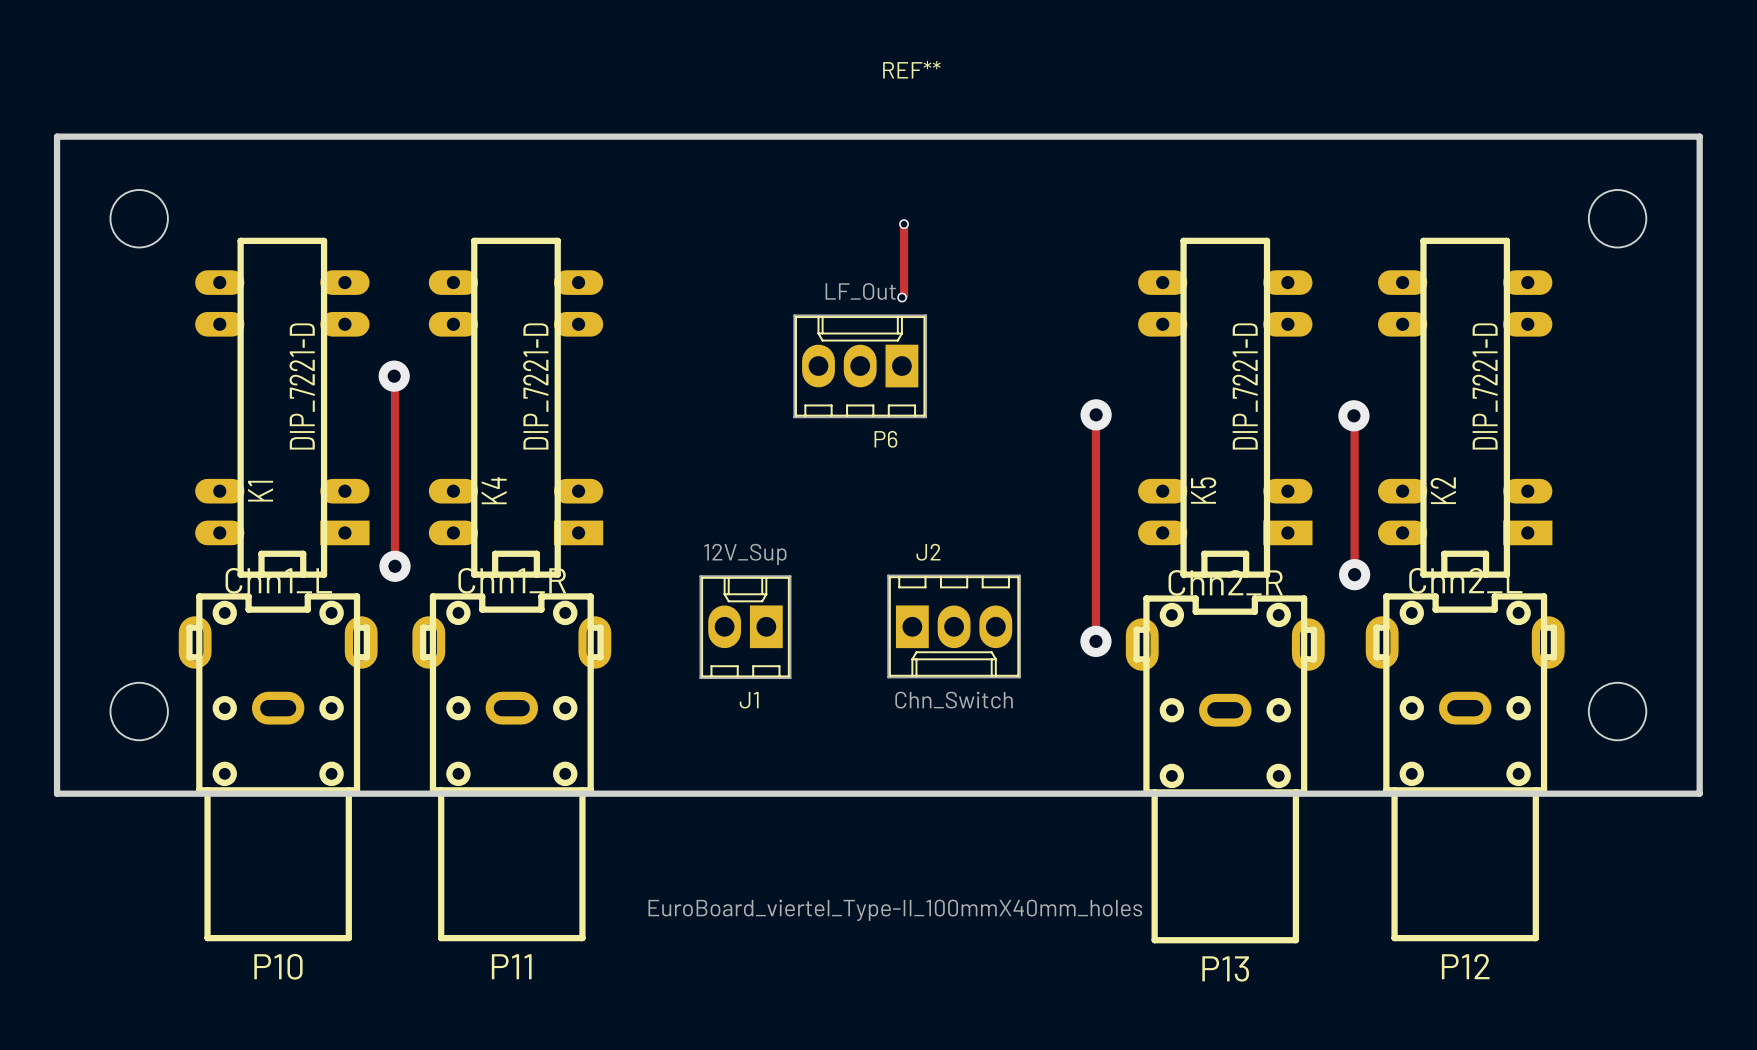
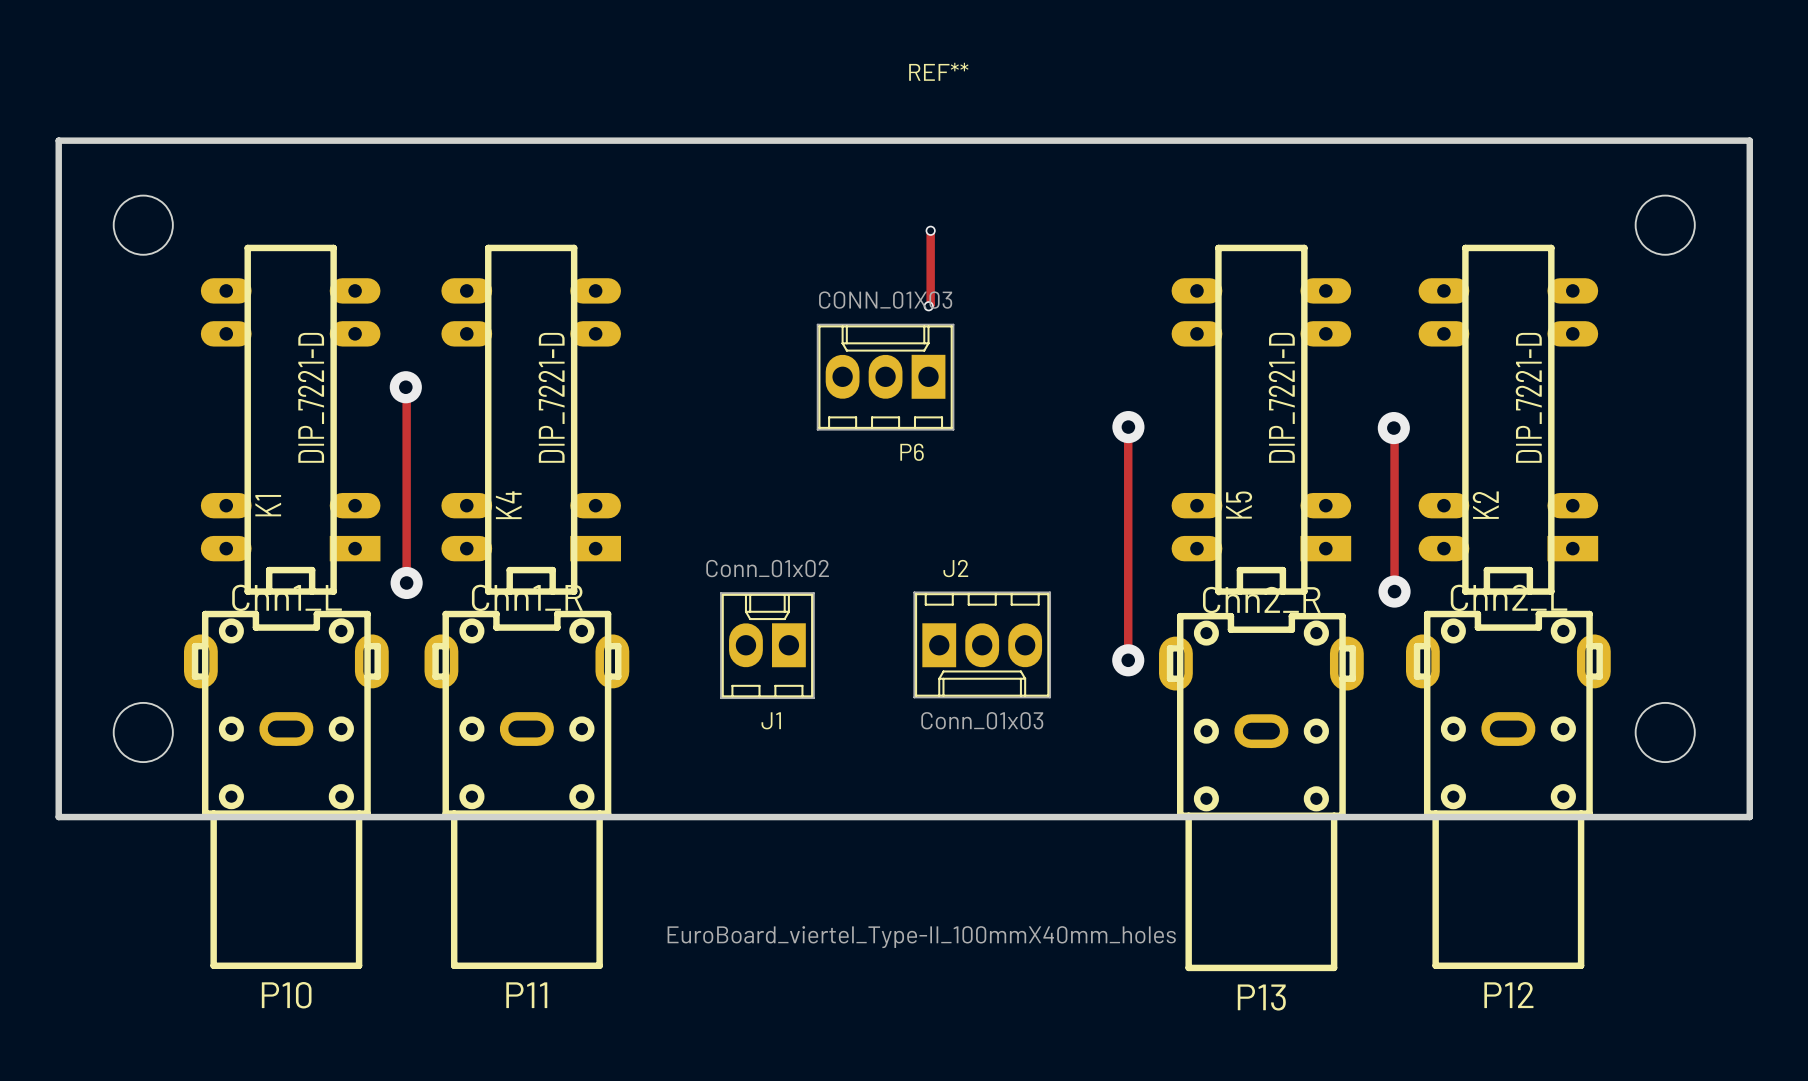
P6 value: LF_Out (860, 291) -> CONN_01X03 (885, 300)
J1 value: 12V_Sup (745, 554) -> Conn_01x02 (767, 568)
J2 value: Chn_Switch (954, 700) -> Conn_01x03 (982, 720)

